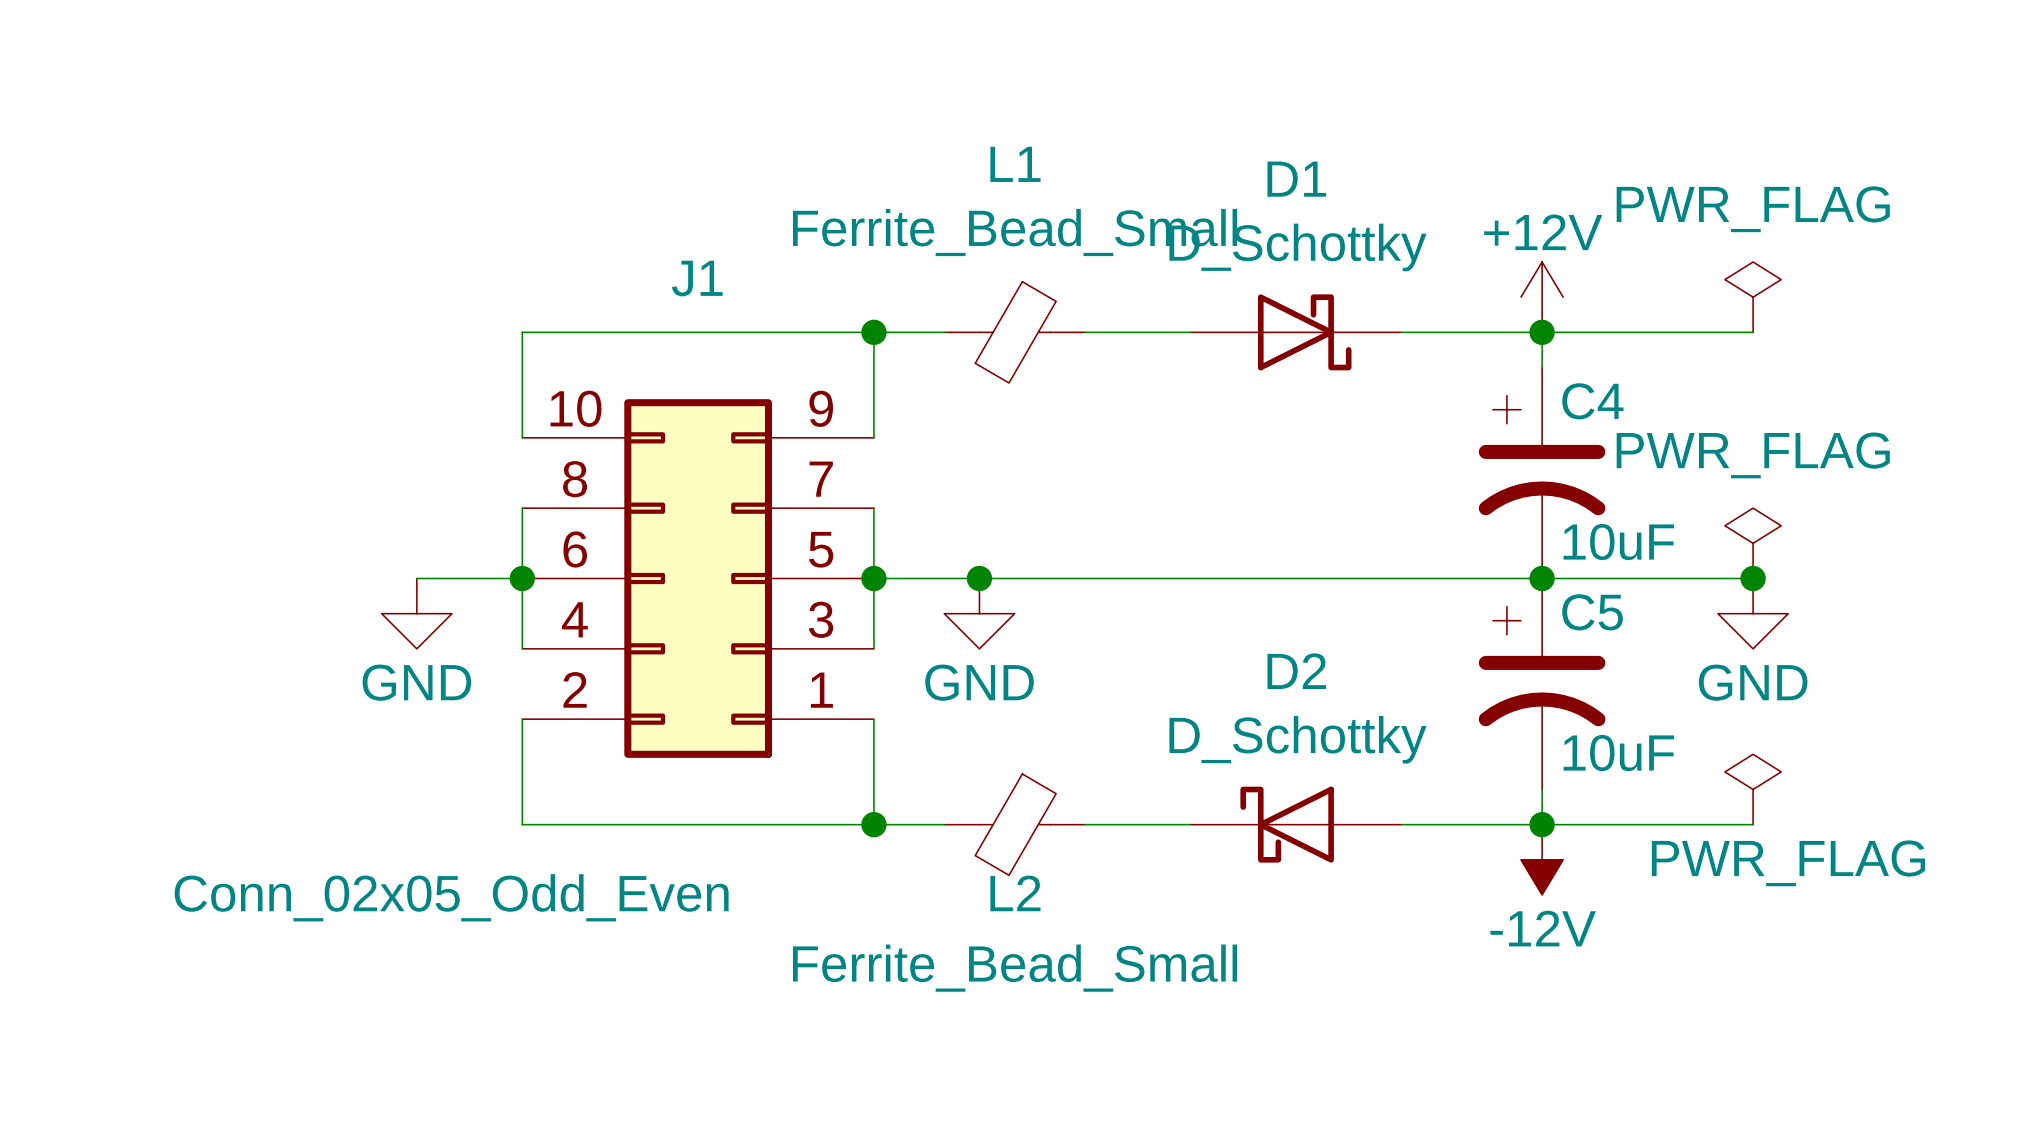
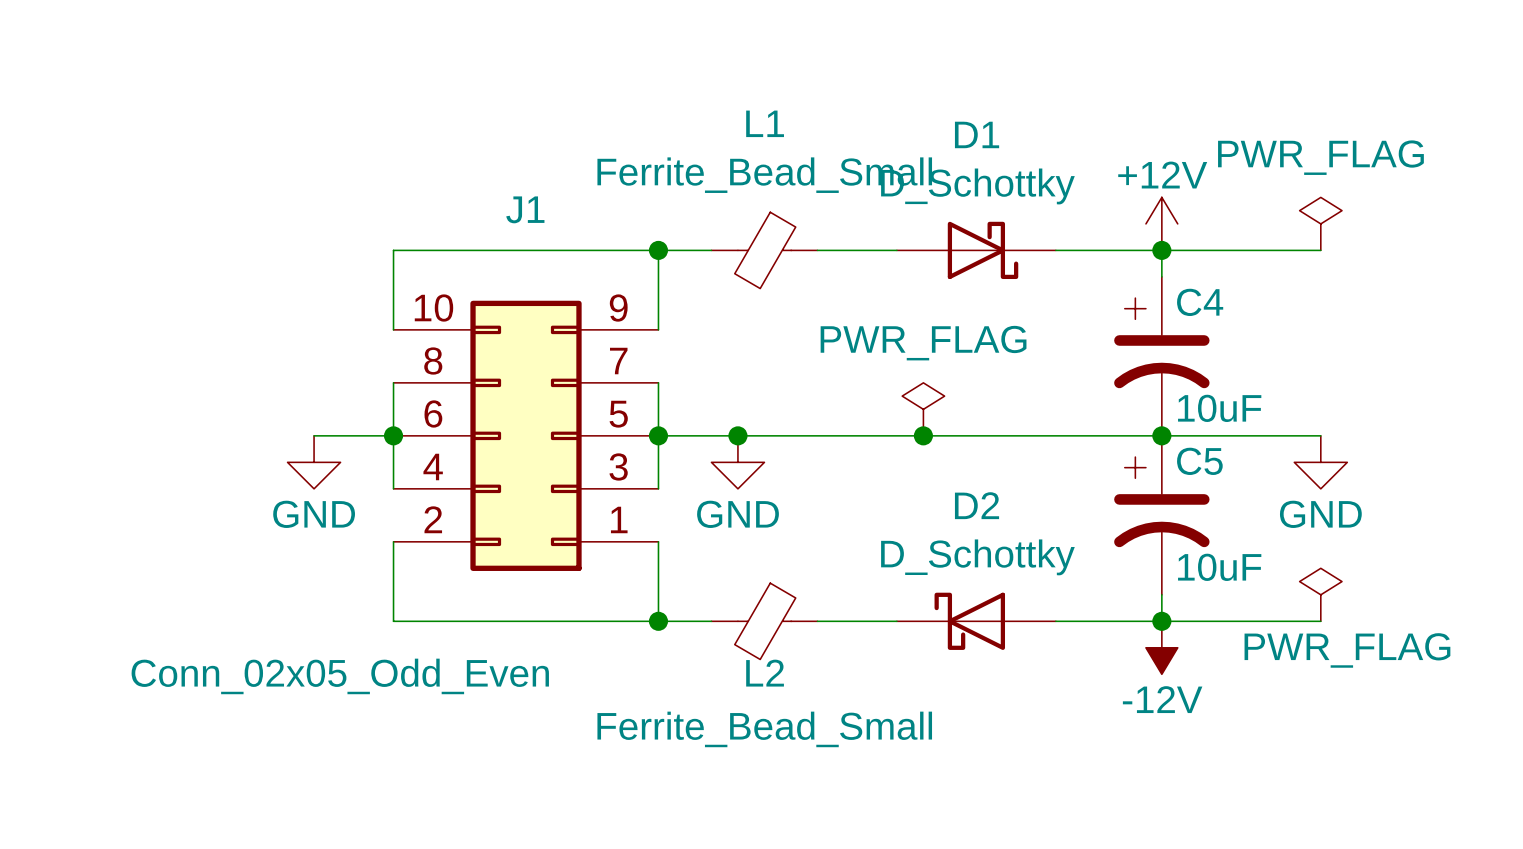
power symbol position: PWR_FLAG (1753, 543) -> PWR_FLAG (923, 409)
junction: none -> (923, 435)
junction: (1753, 578) -> none

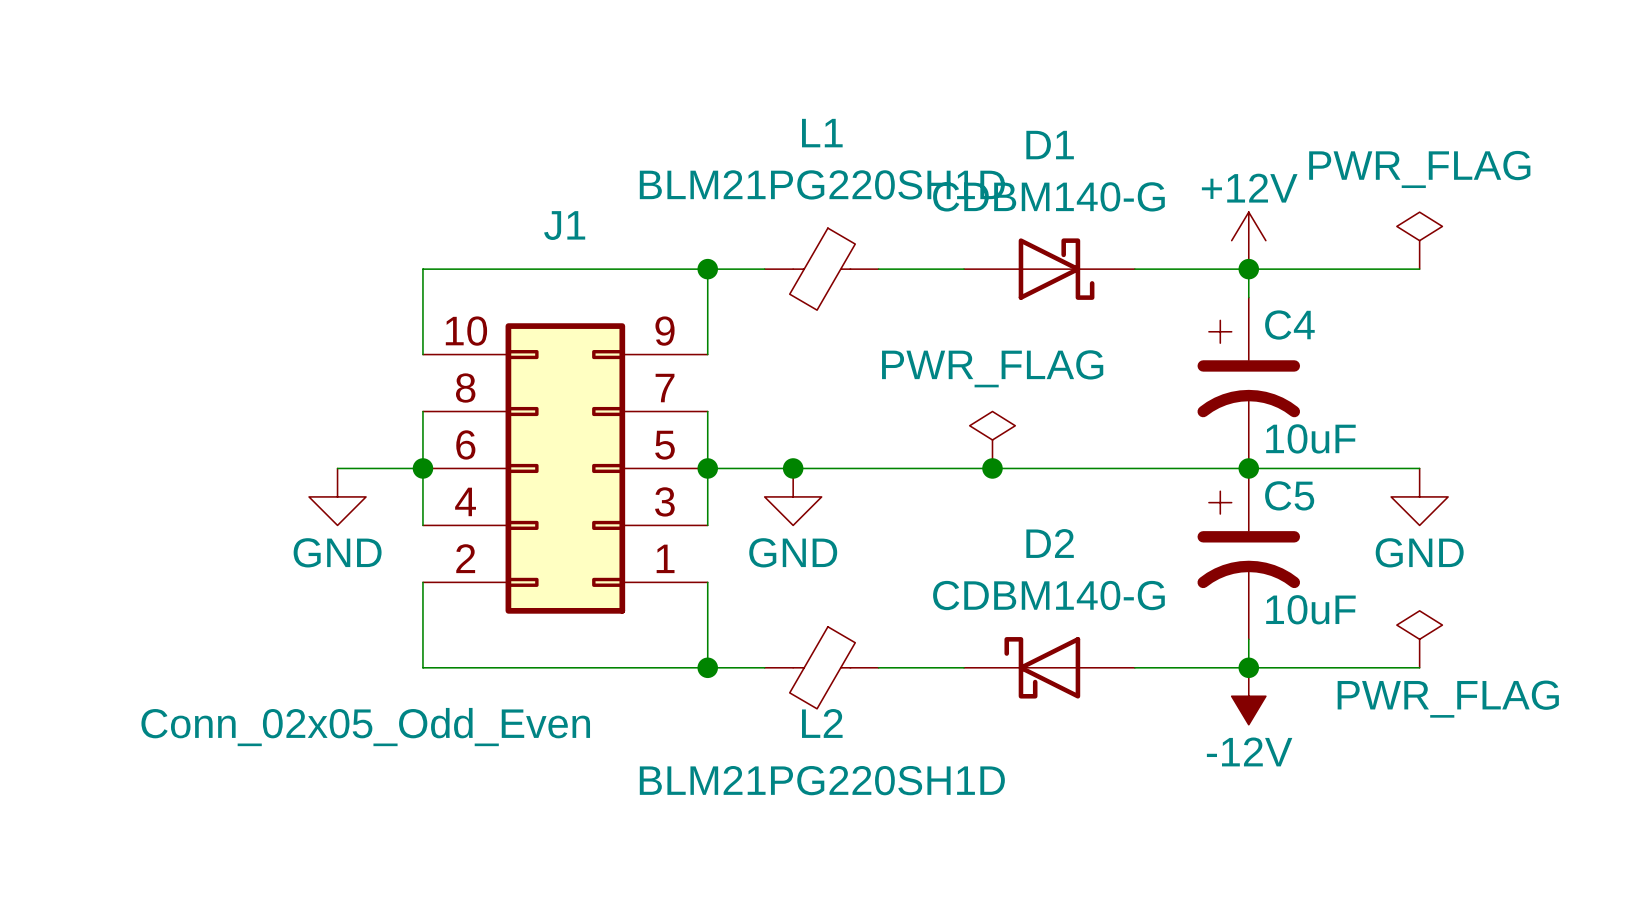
L1 value: Ferrite_Bead_Small (764, 175) -> BLM21PG220SH1D (822, 184)
D1 value: D_Schottky (977, 186) -> CDBM140-G (1048, 196)
D2 value: D_Schottky (977, 557) -> CDBM140-G (1048, 595)
L2 value: Ferrite_Bead_Small (764, 729) -> BLM21PG220SH1D (822, 780)

